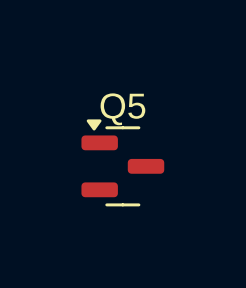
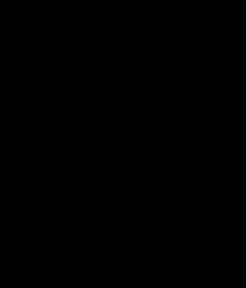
Q5: (122, 162) -> none

